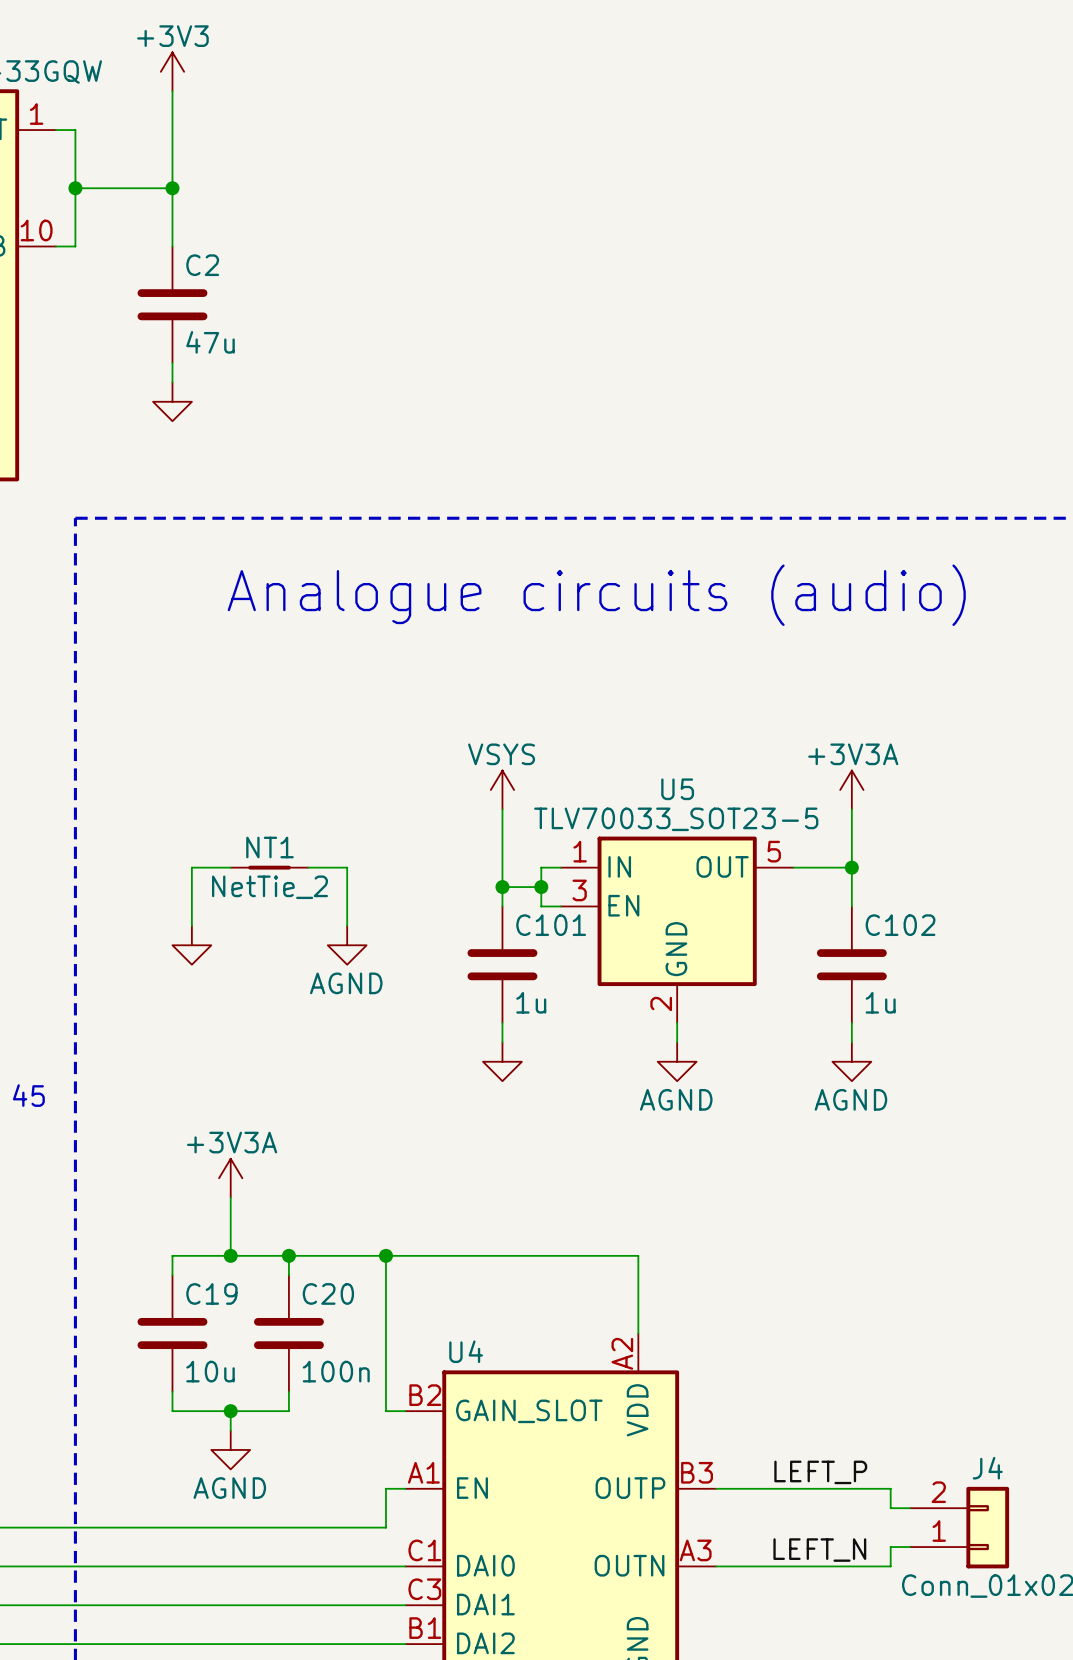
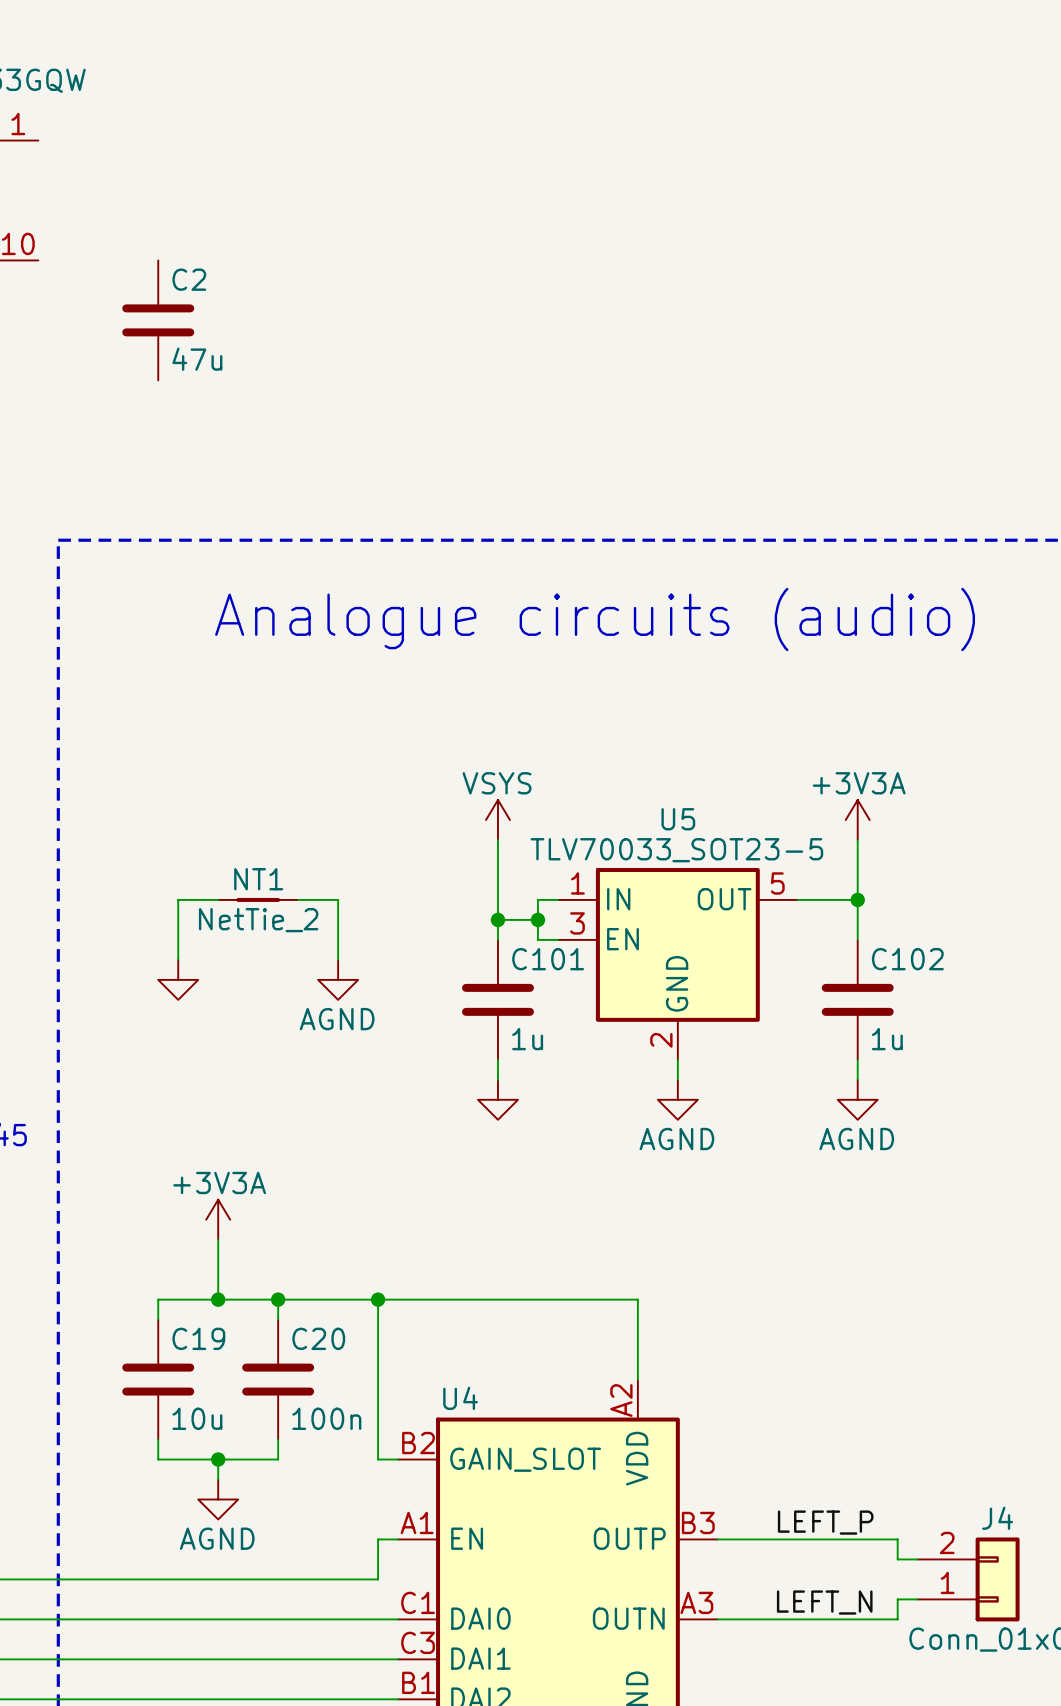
power symbol: +3V3 (172, 71) -> none
wire: (172, 91) (172, 246) -> none
wire: (56, 130) (75, 130) (75, 246) (56, 246) -> none
wire: (75, 188) (172, 188) -> none
junction: (75, 188) -> none
junction: (172, 188) -> none
wire: (172, 362) (172, 382) -> none
power symbol: (172, 401) -> none

